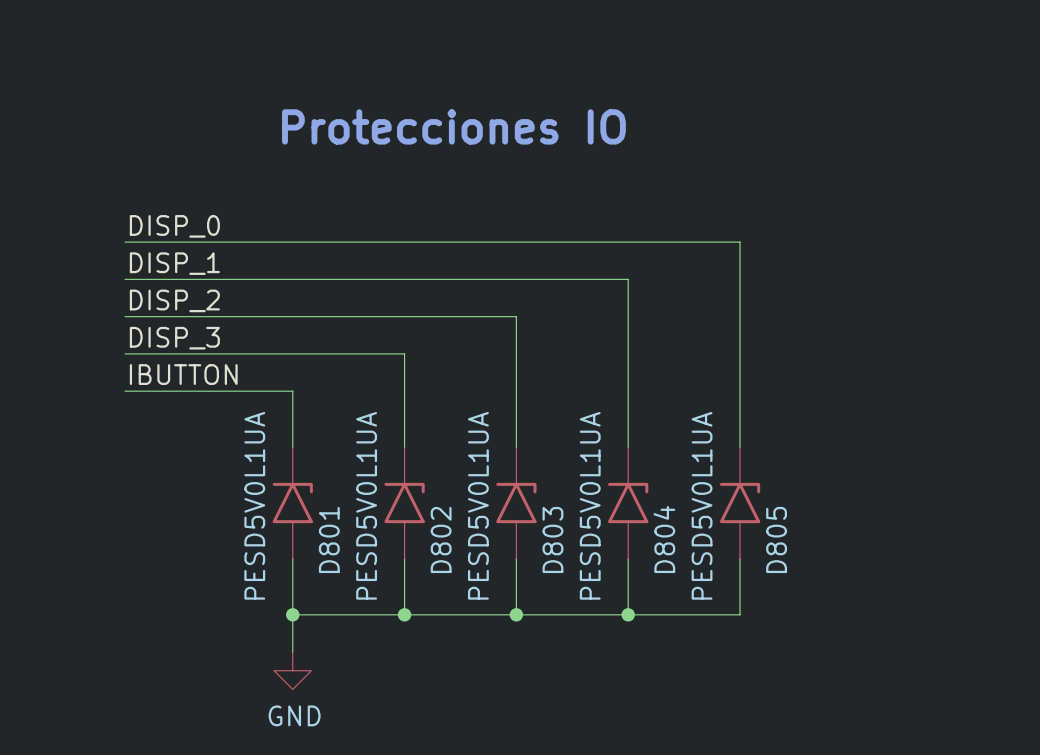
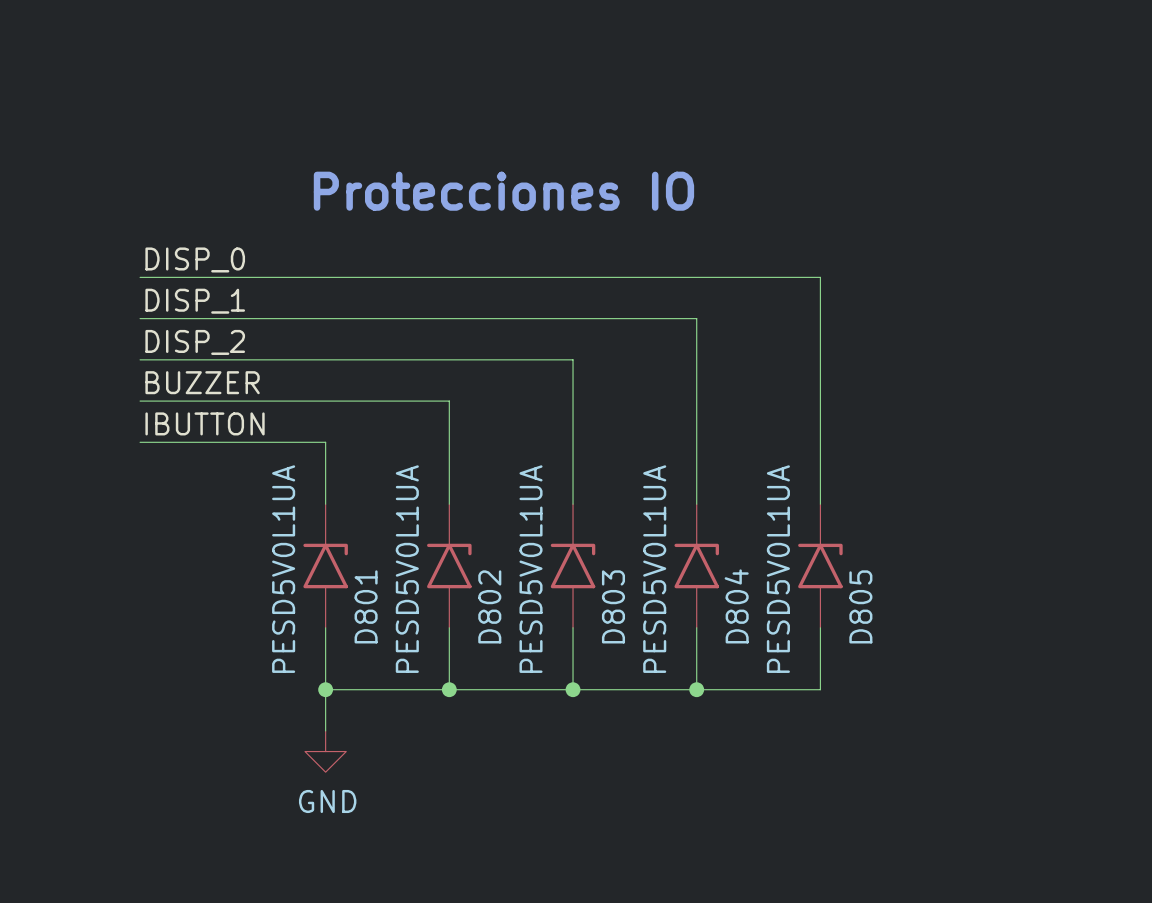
text position: Protecciones IO (453, 126) -> Protecciones IO (503, 191)
label: DISP_3 (174, 338) -> BUZZER (202, 382)

